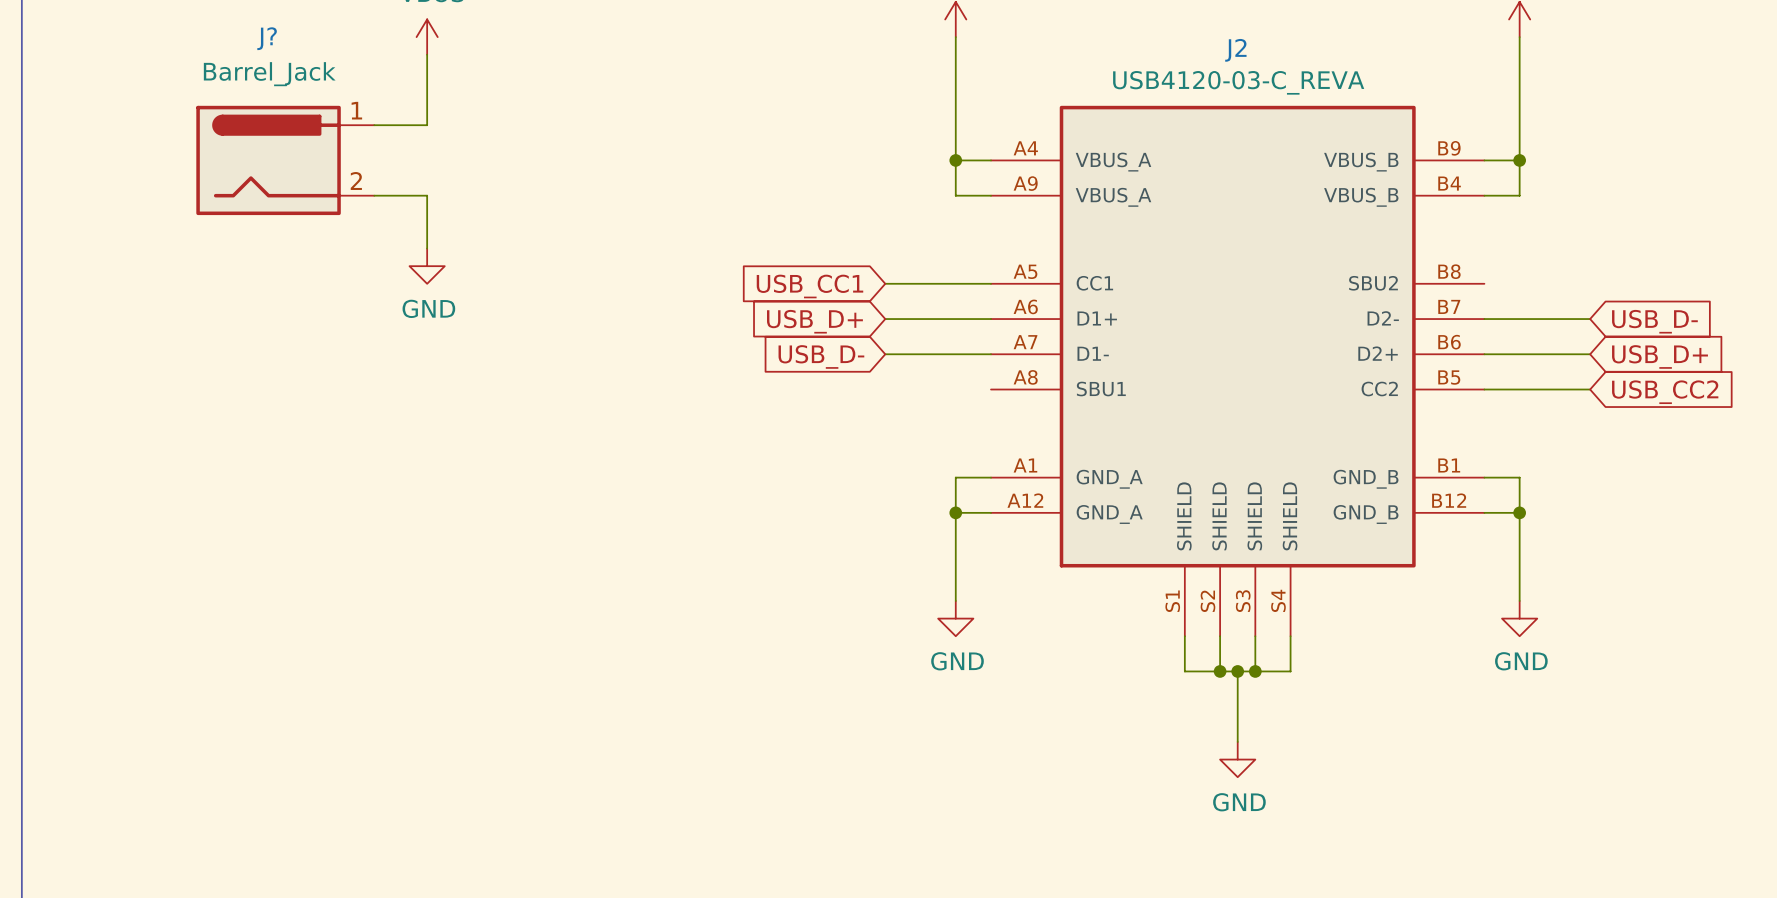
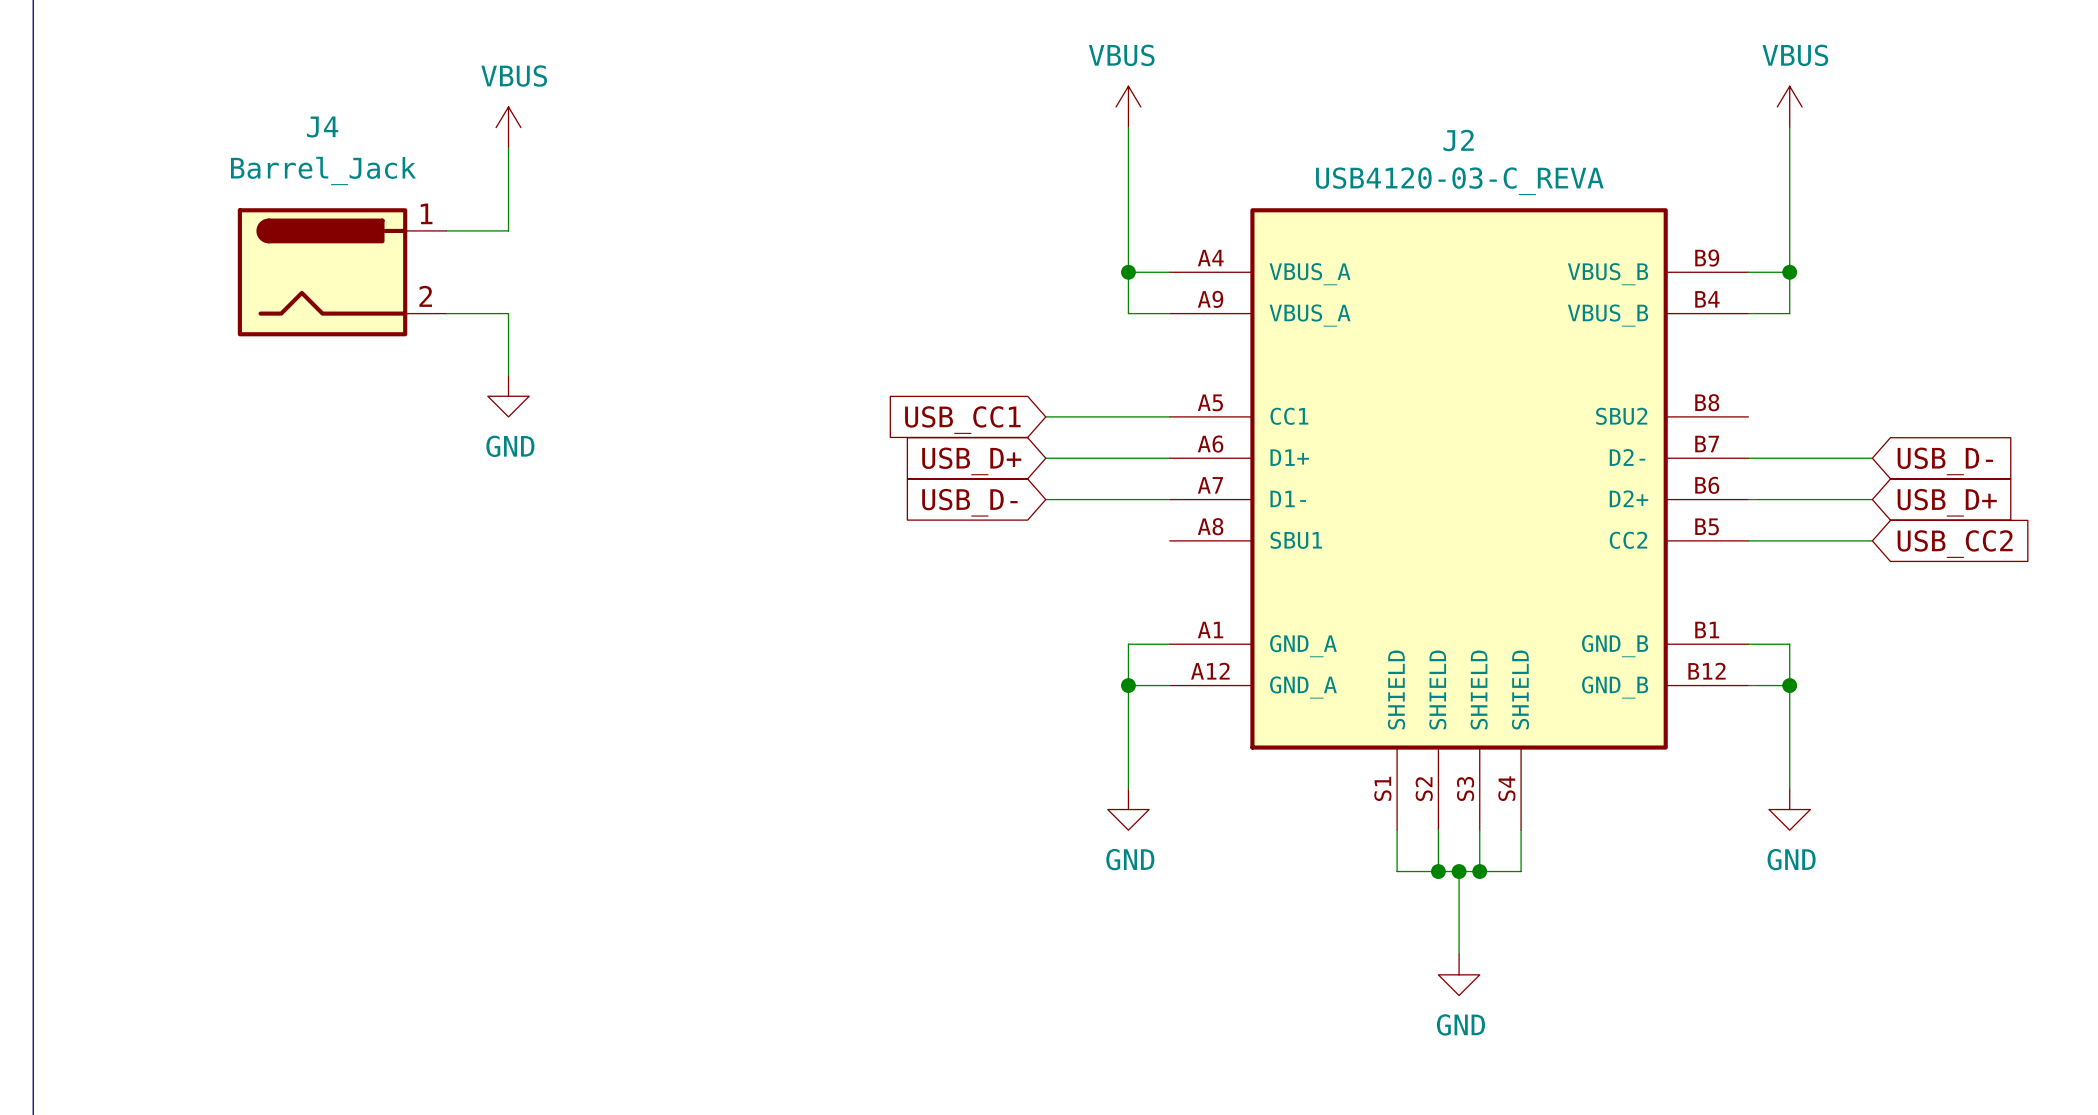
J? name: J? (267, 38) -> J4 (322, 127)

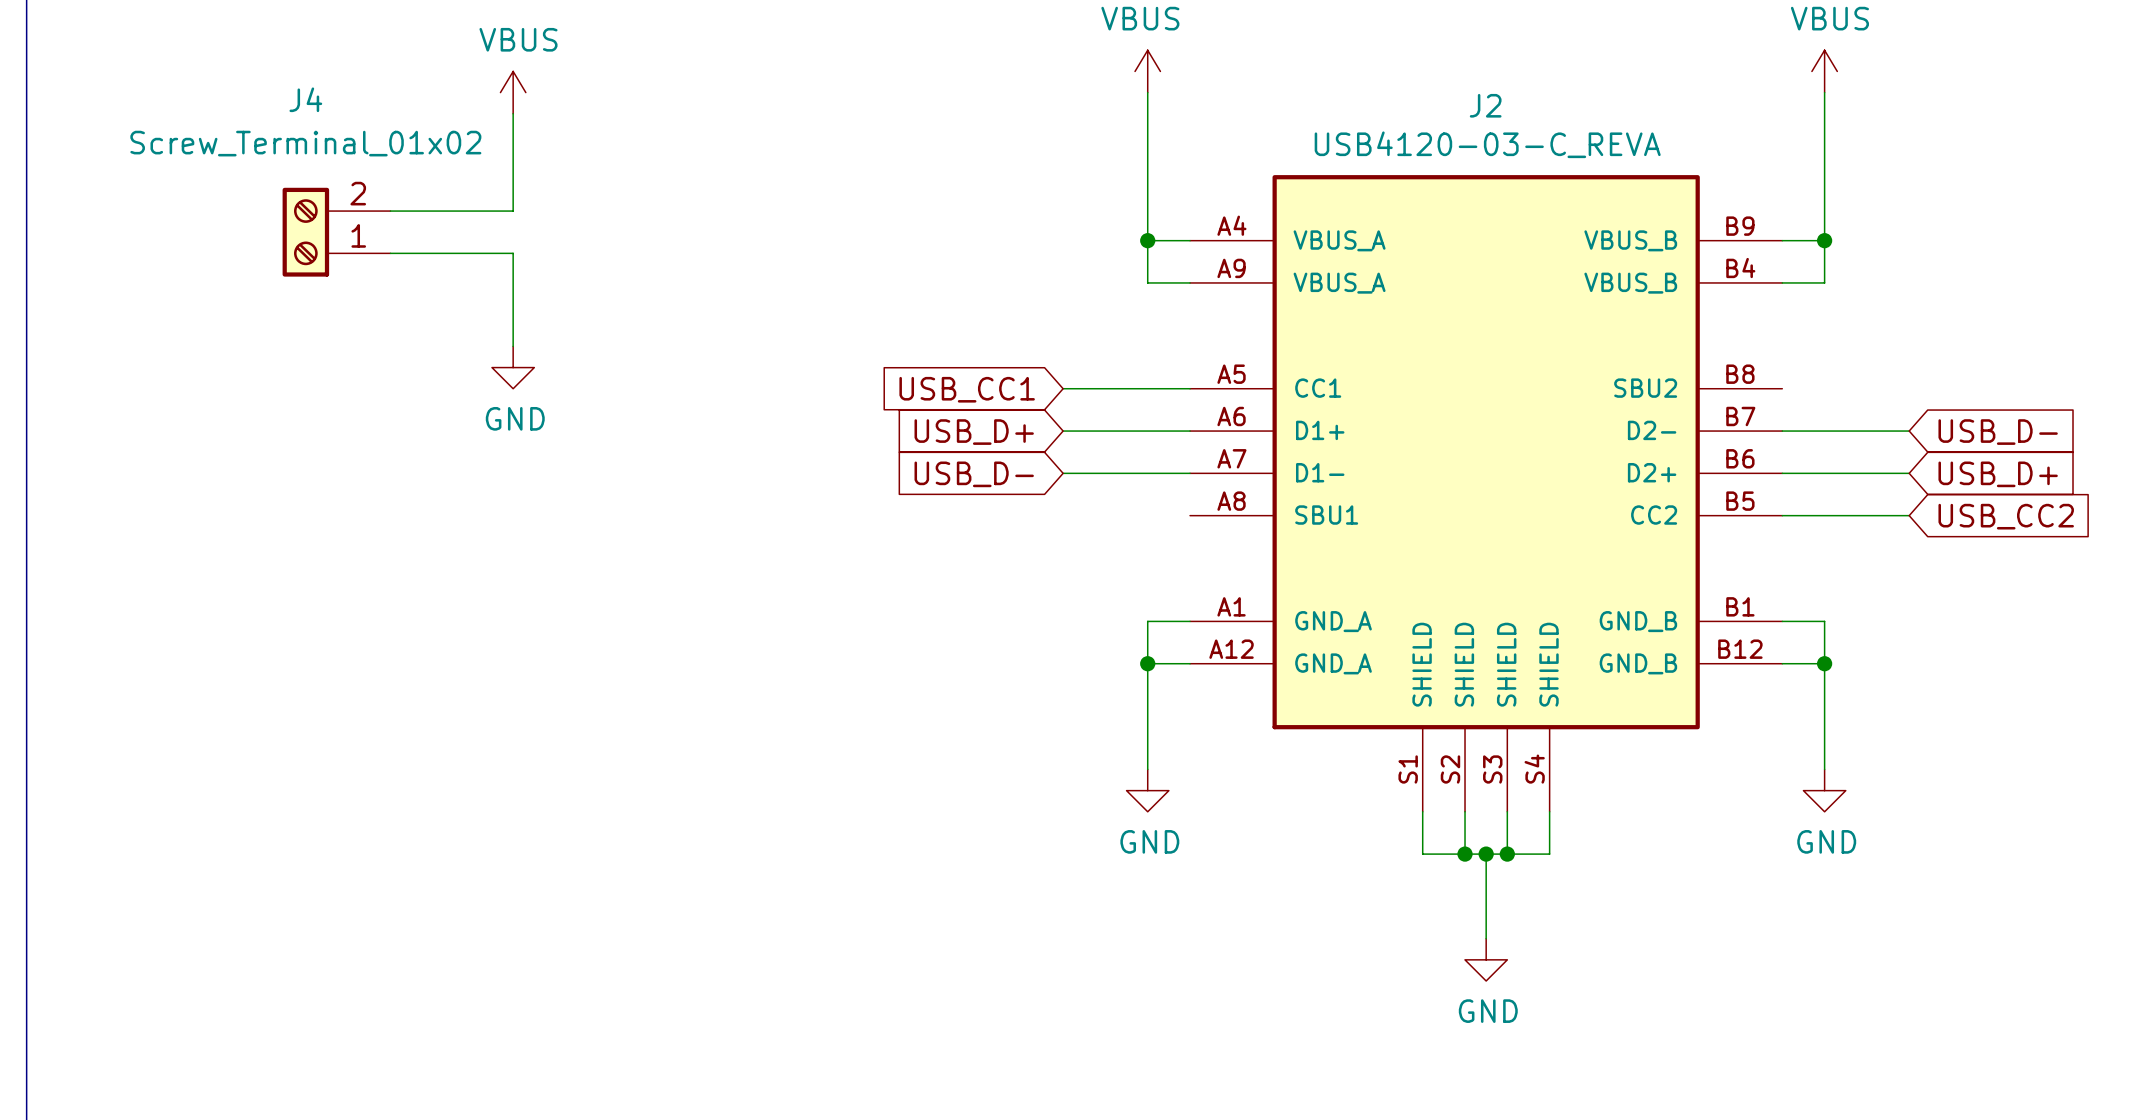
J4 value: Barrel_Jack (323, 171) -> Screw_Terminal_01x02 (305, 143)
J4 symbol: [237, 208, 447, 337] -> [282, 187, 391, 277]
wire: (446, 230) (508, 230) -> (390, 211) (513, 211) (513, 198)
wire: (446, 313) (508, 313) -> (390, 253) (513, 253) (513, 282)

